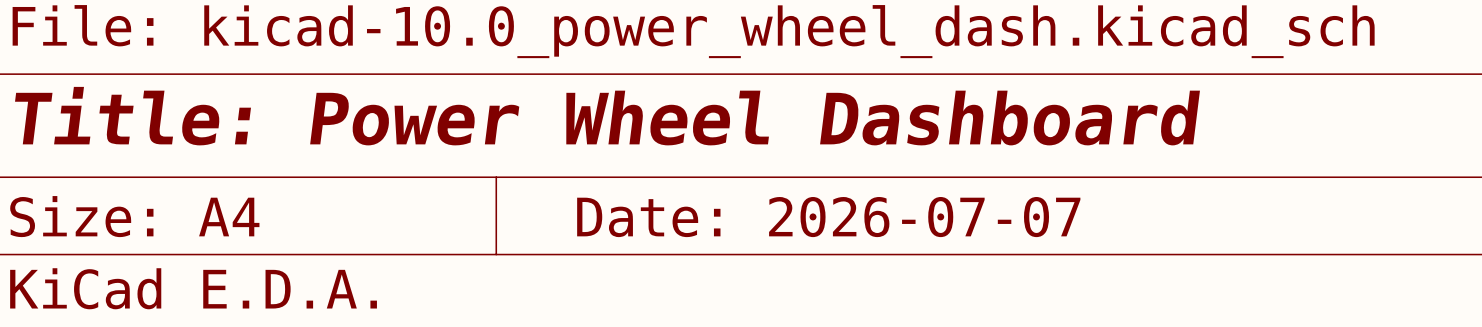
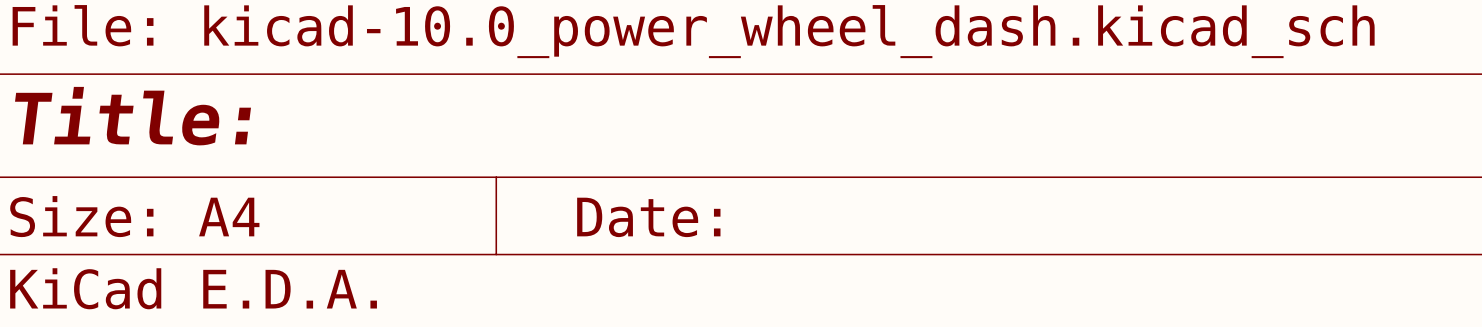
title block: Title: Power Wheel Dashboard (607, 116) -> Title: (133, 116)
title block: Date: 2026-07-07 (828, 217) -> Date: (648, 217)

